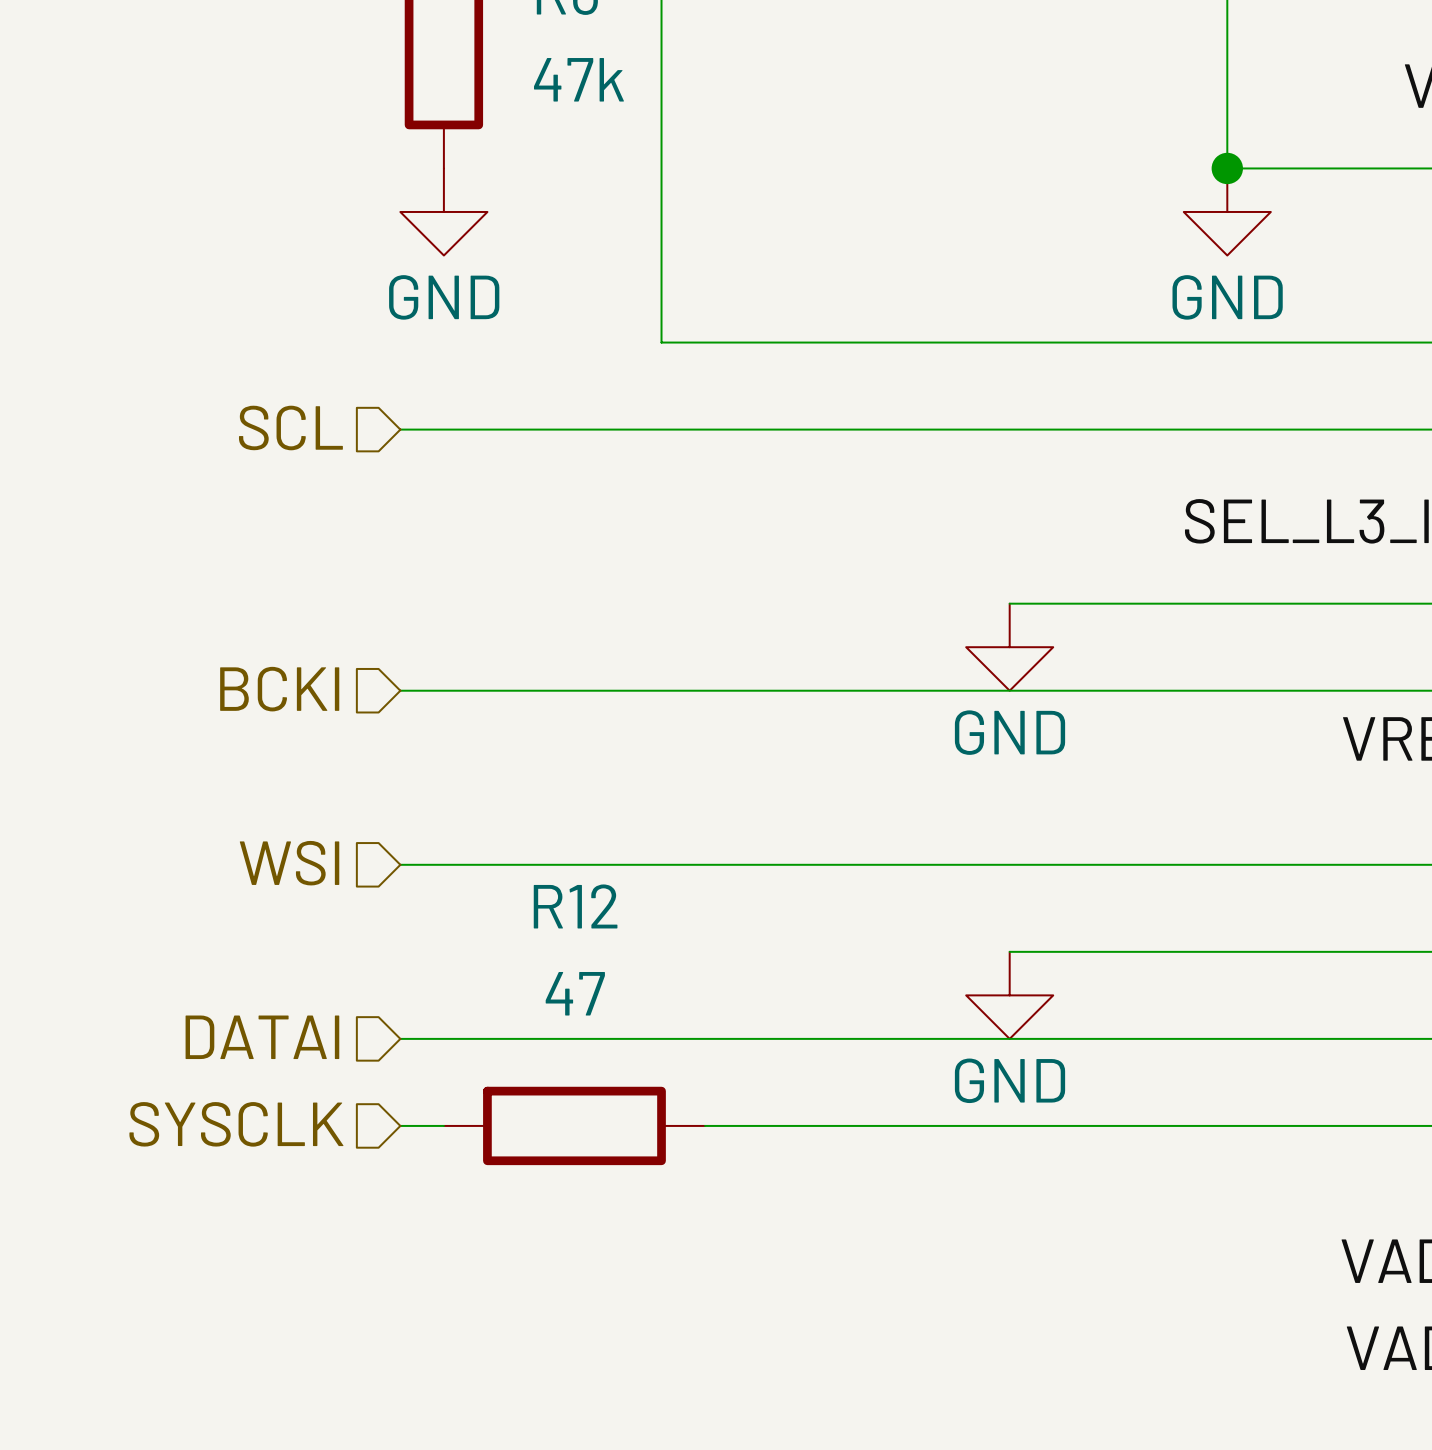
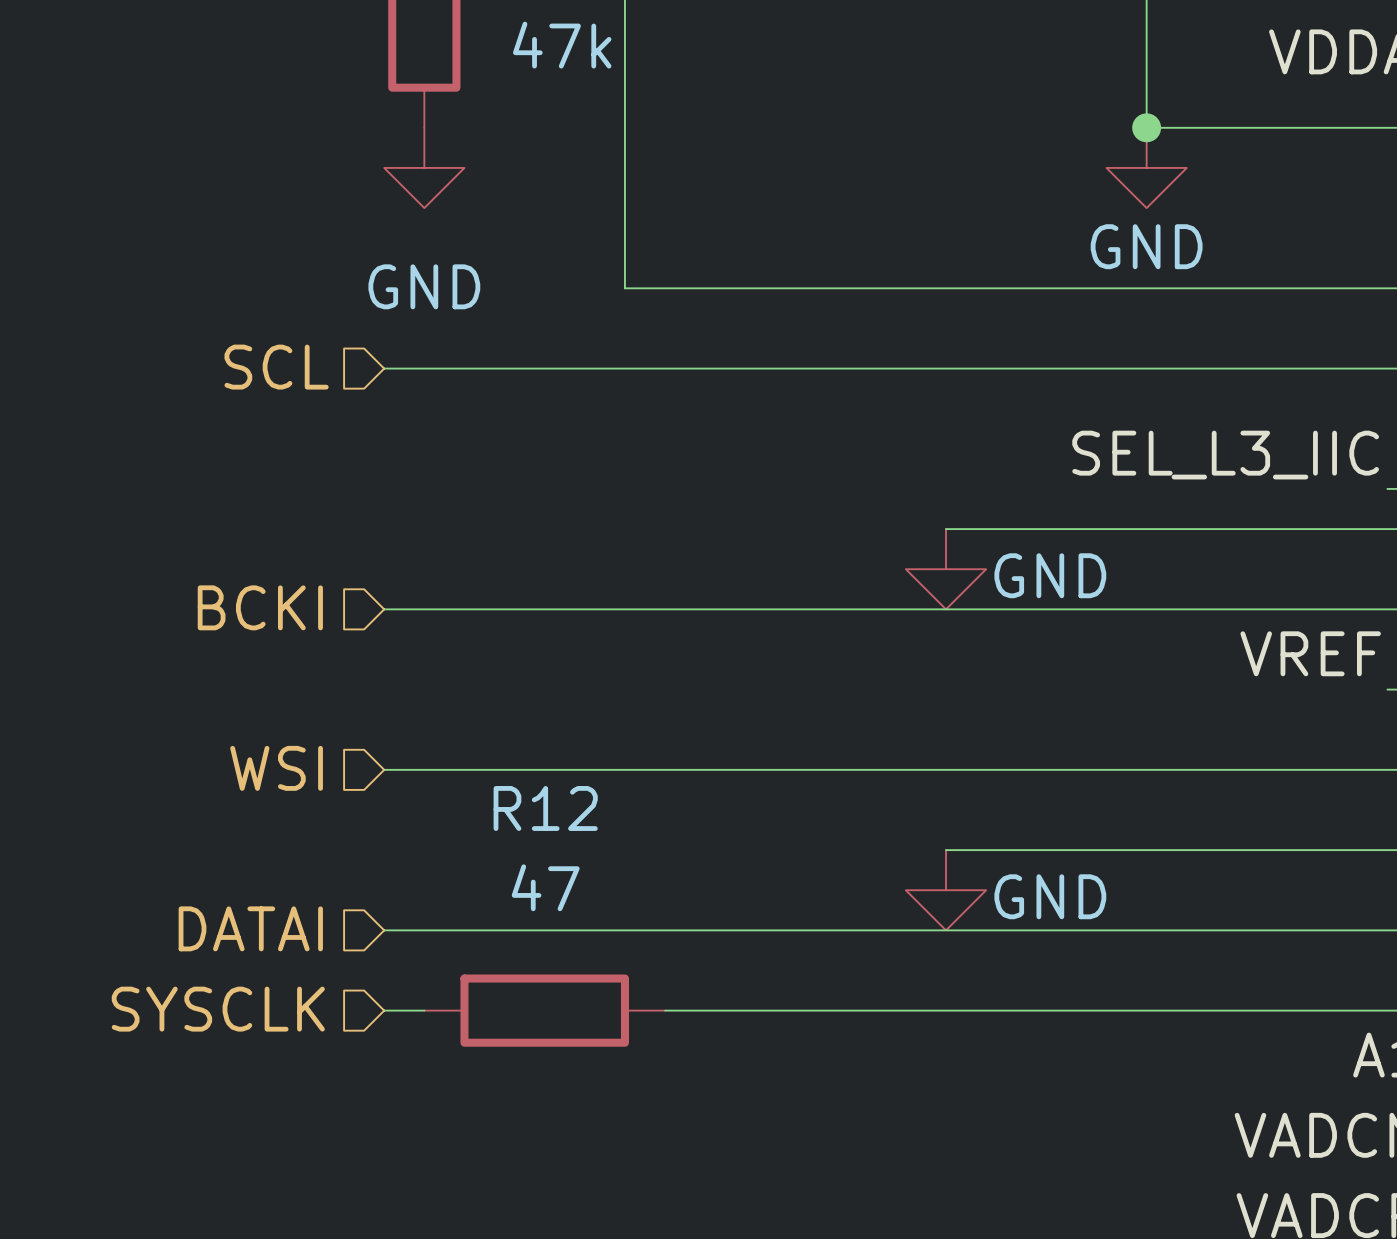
power symbol text position: GND (444, 297) -> GND (424, 286)
power symbol text position: GND (1010, 732) -> GND (1050, 575)
power symbol text position: GND (1010, 1080) -> GND (1050, 896)

